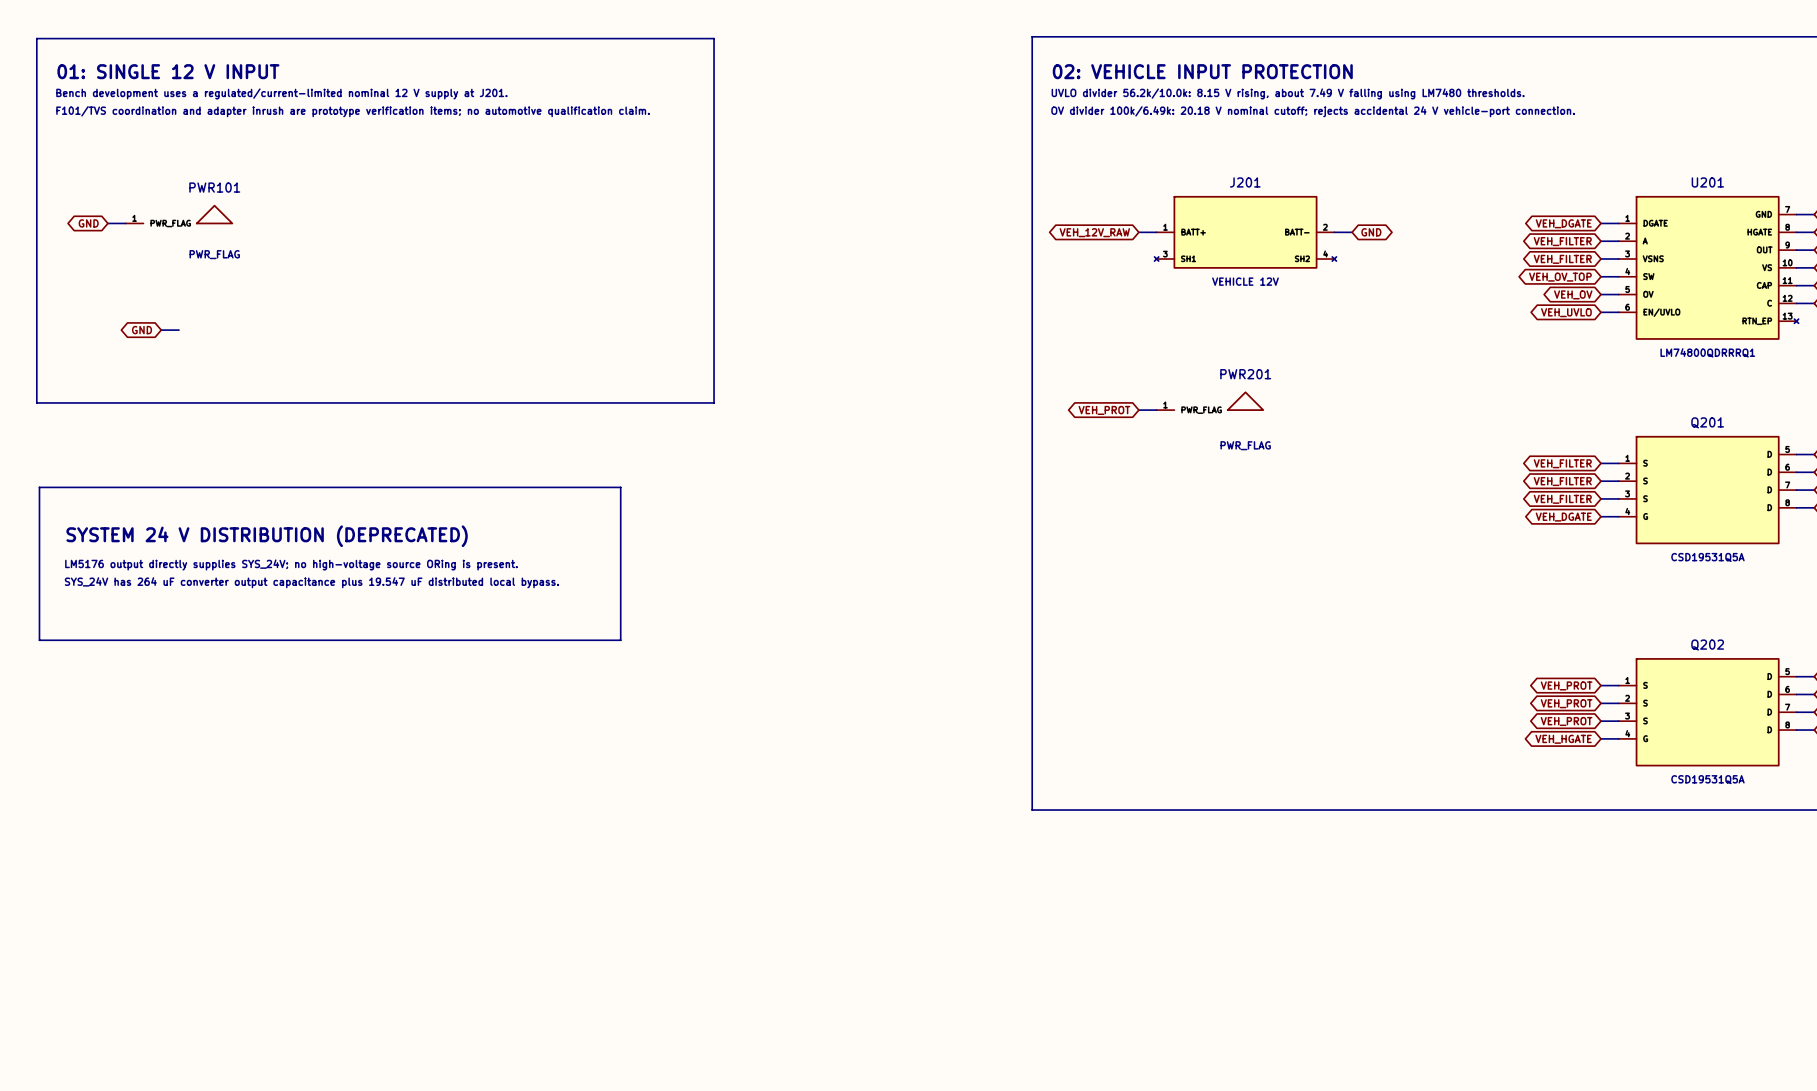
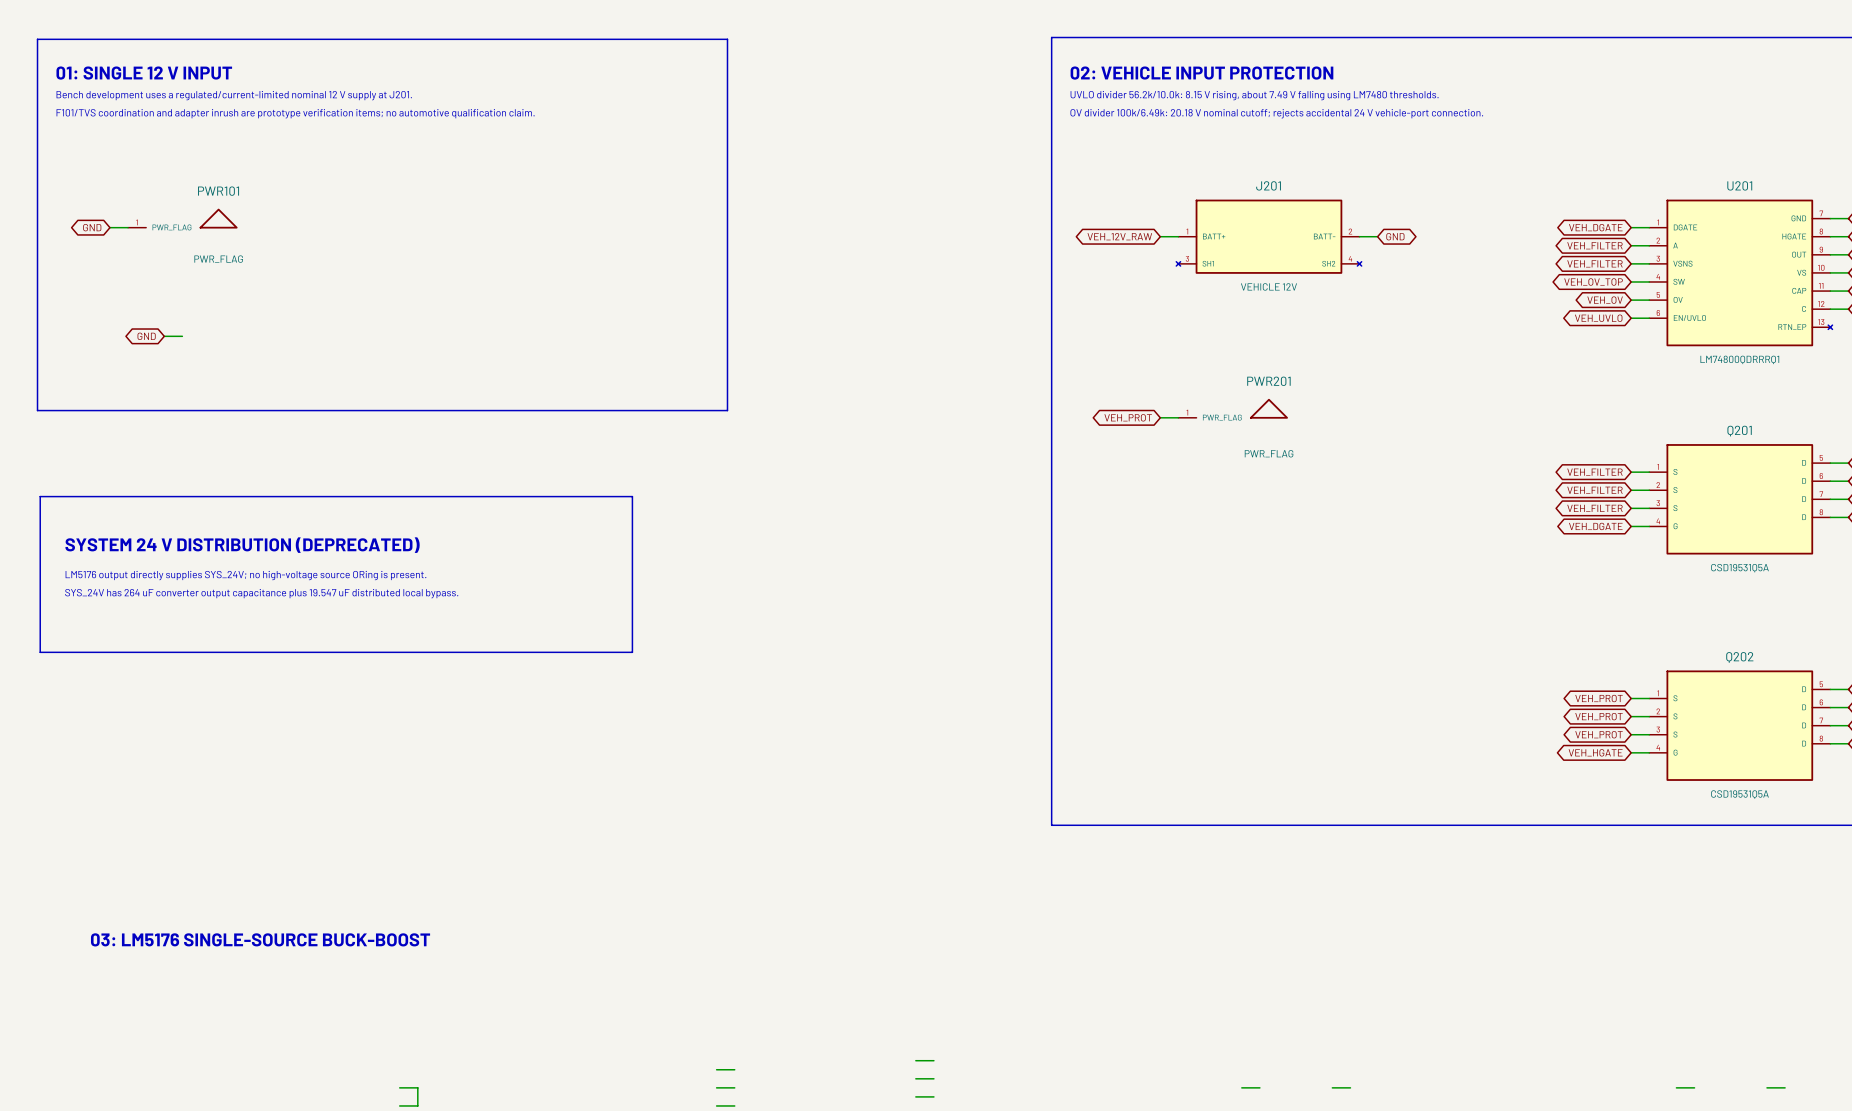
text: none -> 03: LM5176 SINGLE-SOURCE BUCK-BOOST (260, 939)
wire: none -> (915, 1060) (933, 1060)
wire: none -> (716, 1069) (734, 1069)
wire: none -> (915, 1078) (933, 1078)
wire: none -> (399, 1087) (417, 1087) (417, 1105) (399, 1105)
wire: none -> (716, 1087) (734, 1087)
wire: none -> (1241, 1087) (1259, 1087)
wire: none -> (1332, 1087) (1350, 1087)
wire: none -> (1676, 1087) (1694, 1087)
wire: none -> (1766, 1087) (1785, 1087)
wire: none -> (915, 1096) (933, 1096)
wire: none -> (716, 1105) (734, 1105)

